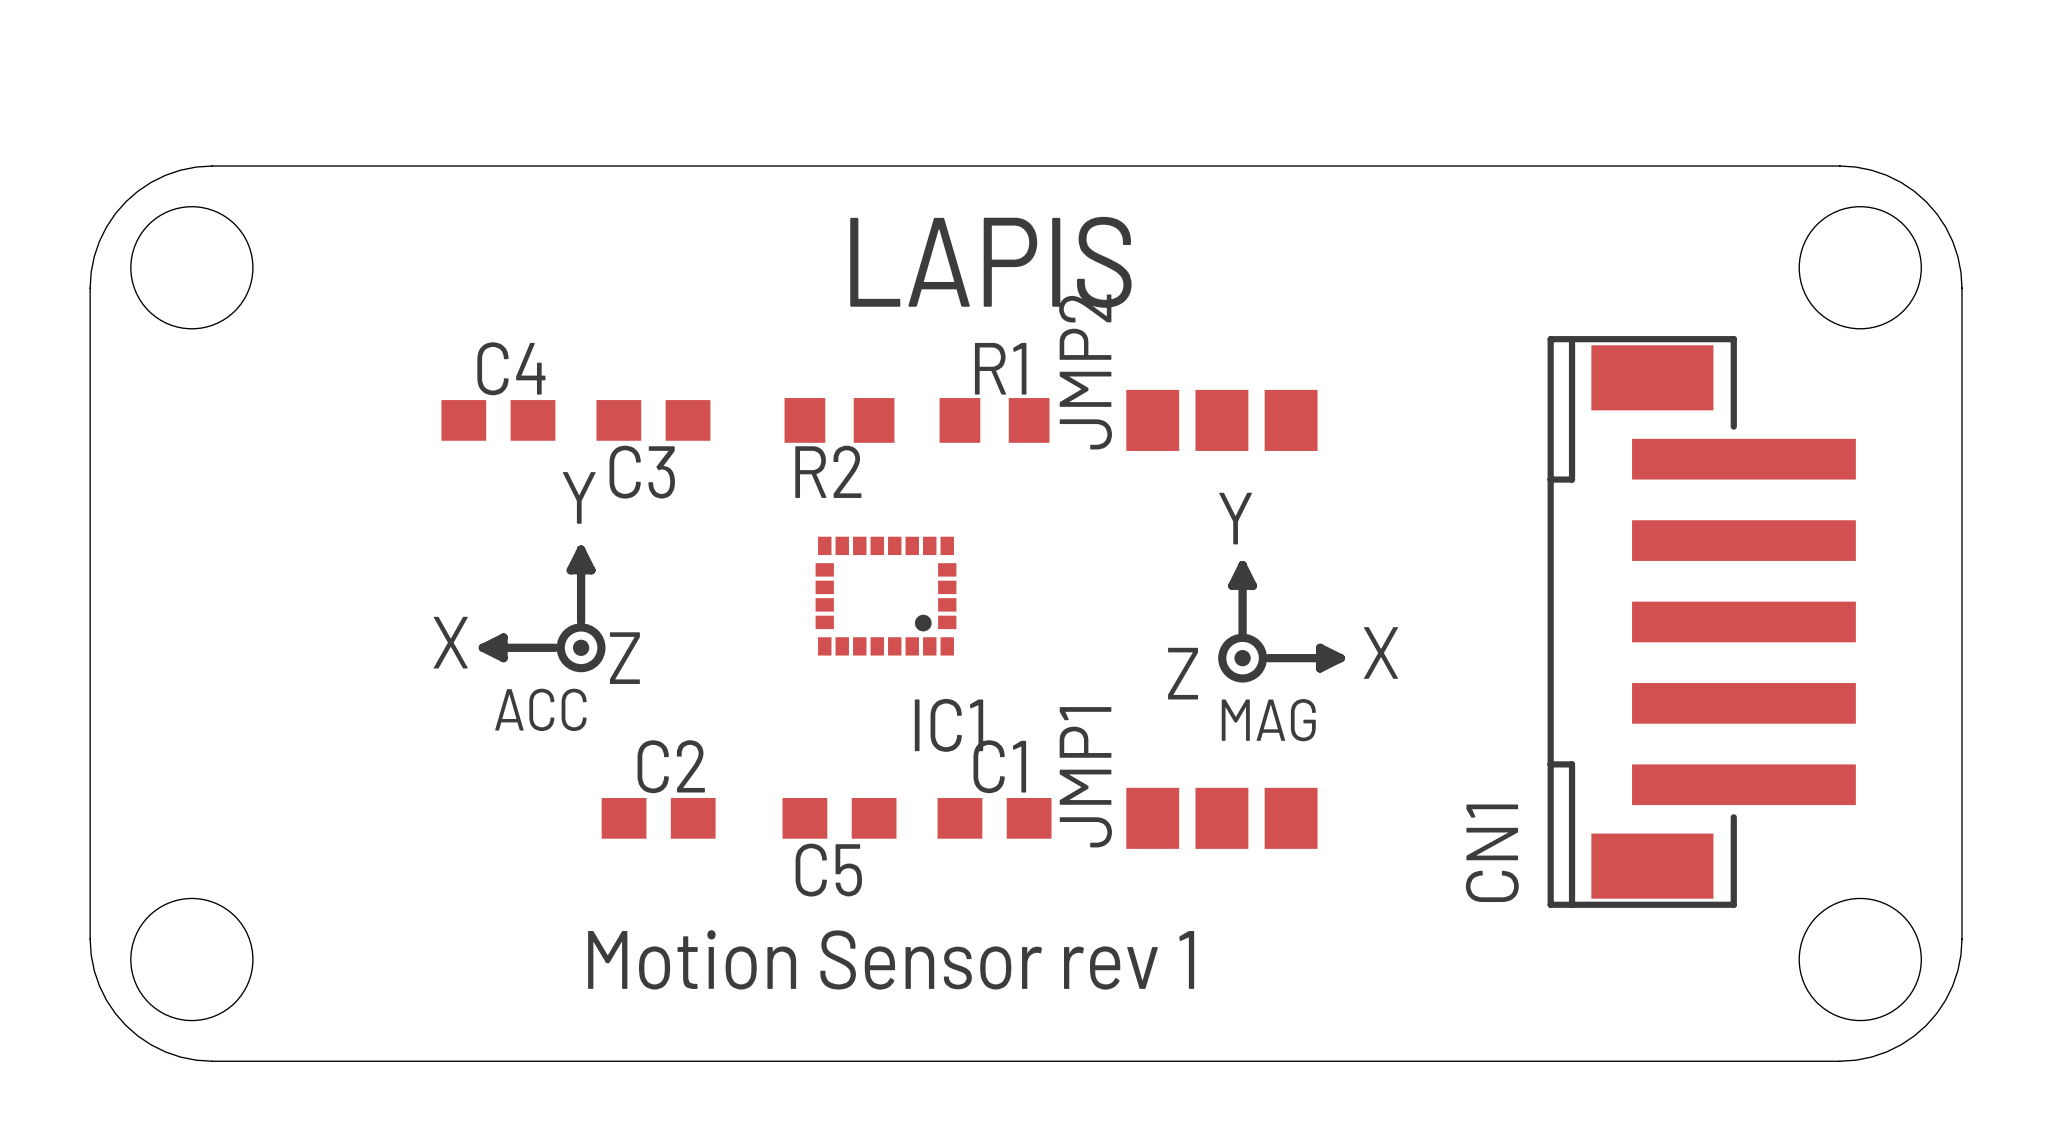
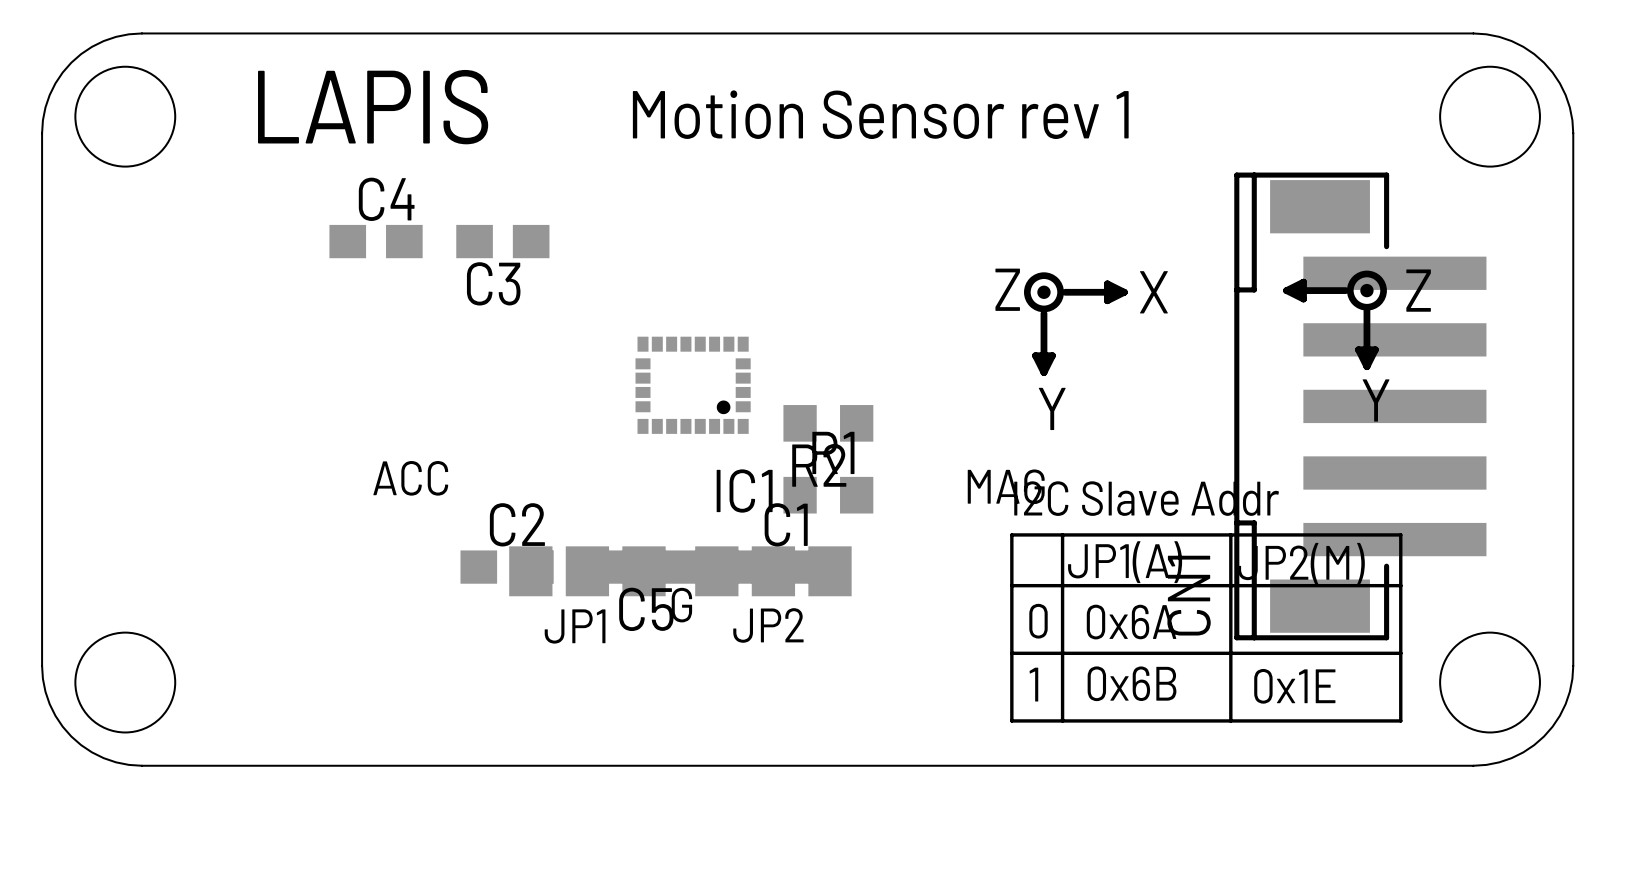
text position: LAPIS (990, 262) -> LAPIS (373, 107)
R2 position: (839, 420) -> (828, 423)
R1 position: (994, 420) -> (828, 495)
JMP2: (1221, 420) -> none
drawing: none -> [1346, 270, 1387, 311]
line: none -> (1286, 290) (1345, 290)
line: none -> (1286, 290) (1303, 299) (1303, 282) (1286, 290)
text: none -> Z (1418, 290)
text: Y (579, 497) -> none
line: none -> (1366, 307) (1366, 366)
text position: Y (1235, 518) -> Y (1052, 408)
line: (581, 549) (581, 621) -> none
line: (581, 549) (570, 570) (591, 570) (581, 549) -> none
line: (1242, 565) (1242, 637) -> (1043, 313) (1043, 372)
line: (1242, 565) (1232, 585) (1252, 585) (1242, 565) -> none
line: none -> (1366, 366) (1375, 349) (1358, 349) (1366, 366)
line: none -> (1043, 372) (1052, 355) (1035, 355) (1043, 372)
text: none -> Y (1376, 400)
drawing: [556, 623, 606, 673] -> none
text: X (450, 642) -> none
line: (482, 647) (555, 647) -> none
line: (482, 647) (503, 658) (503, 637) (482, 647) -> none
text position: X (1380, 652) -> X (1153, 292)
text: Z (624, 658) -> none
drawing position: (1242, 658) -> (1043, 292)
drawing position: (1242, 658) -> (1043, 292)
line: (1268, 658) (1340, 658) -> (1065, 292) (1124, 292)
line: (1340, 658) (1320, 647) (1320, 668) (1340, 658) -> (1124, 292) (1107, 283) (1107, 300) (1124, 292)
text position: Z (1183, 673) -> Z (1007, 289)
text: none -> I2C Slave Addr (1146, 498)
line: none -> (1011, 534) (1400, 534) (1400, 720) (1011, 720) (1011, 534)
line: none -> (1062, 534) (1062, 720)
line: none -> (1230, 534) (1230, 720)
text: none -> JP1(A) (1125, 562)
text: none -> JP2(M) (1301, 563)
JMP1: (1221, 818) -> none
JP1: none -> (587, 571)
JP2: none -> (773, 571)
line: none -> (1011, 585) (1400, 585)
text: none -> G (681, 605)
text: none -> 0 (1038, 621)
text: none -> 0x6A (1131, 622)
line: none -> (1011, 653) (1400, 653)
text position: Motion Sensor rev 1 (891, 959) -> Motion Sensor rev 1 (880, 114)
text: none -> 0x6B (1132, 683)
text: none -> 1 (1033, 684)
text: none -> 0x1E (1294, 686)

